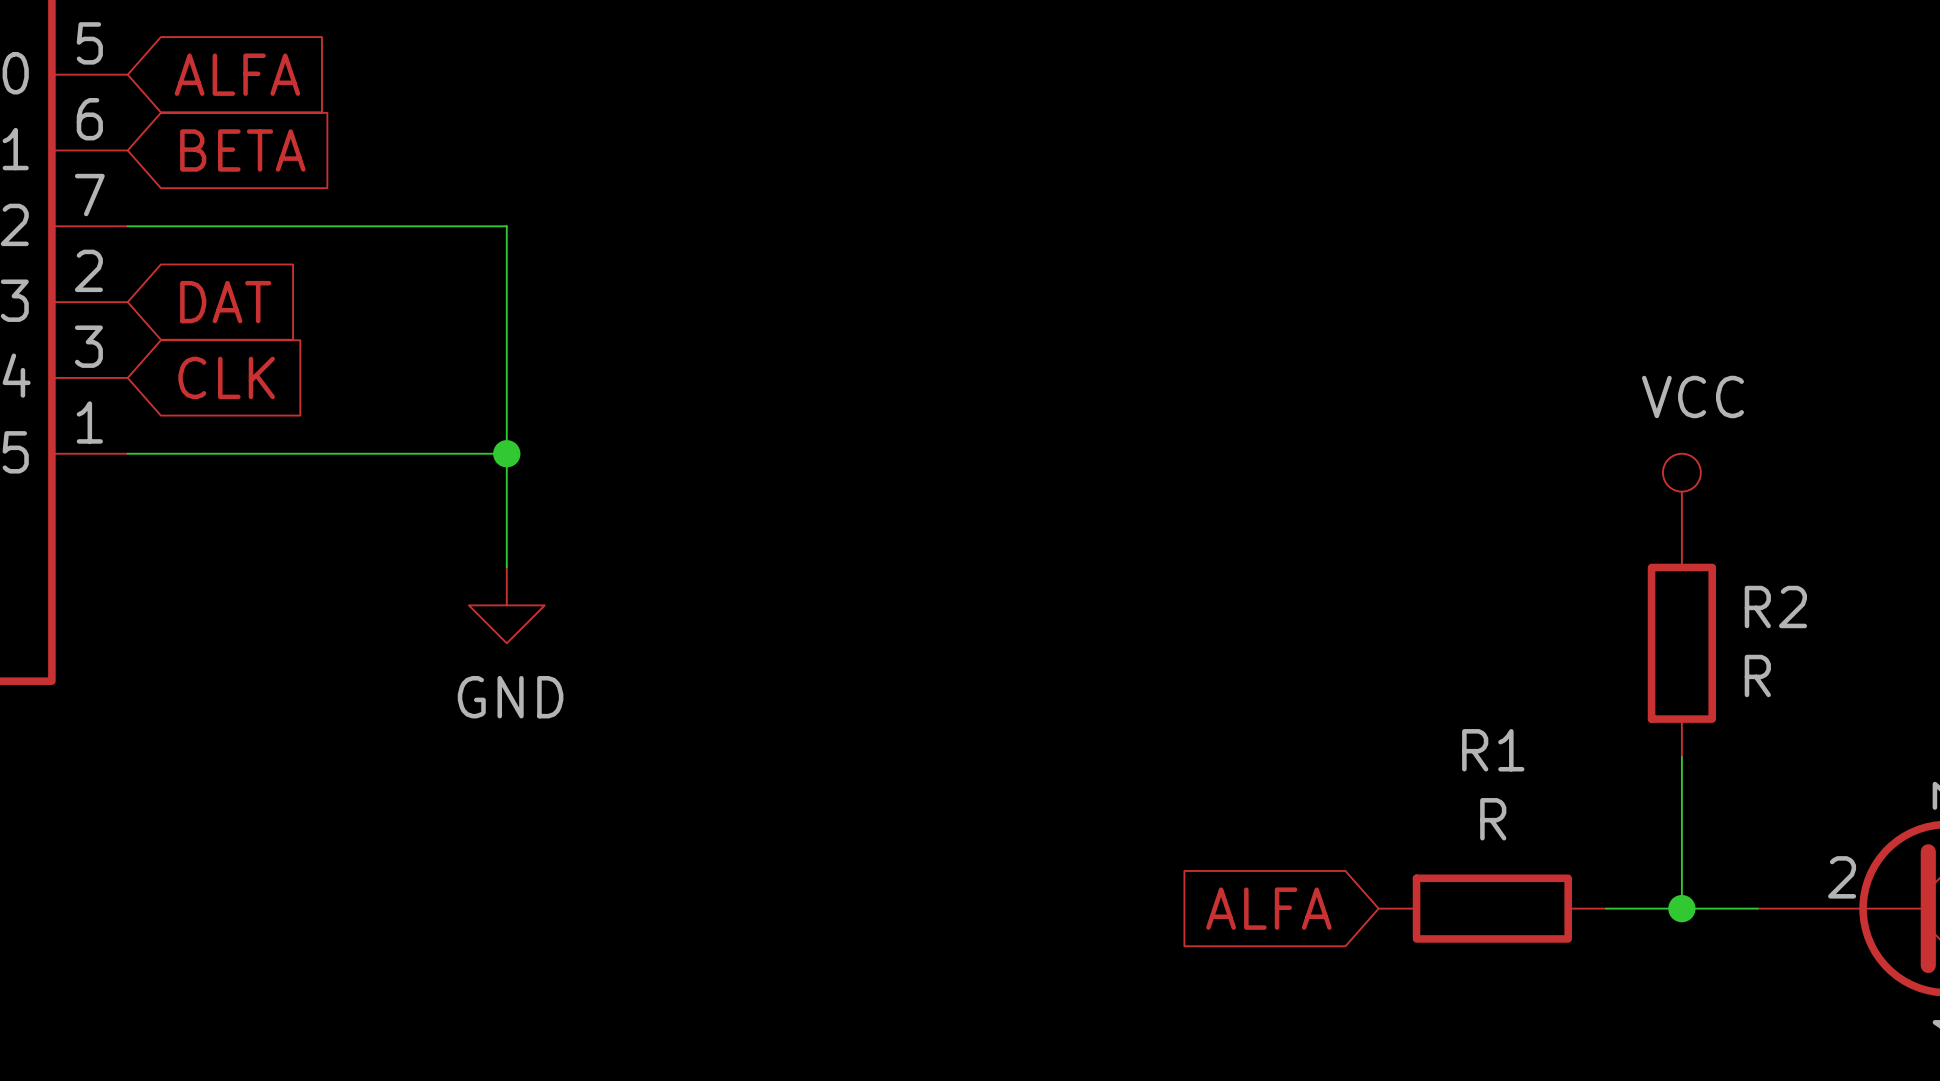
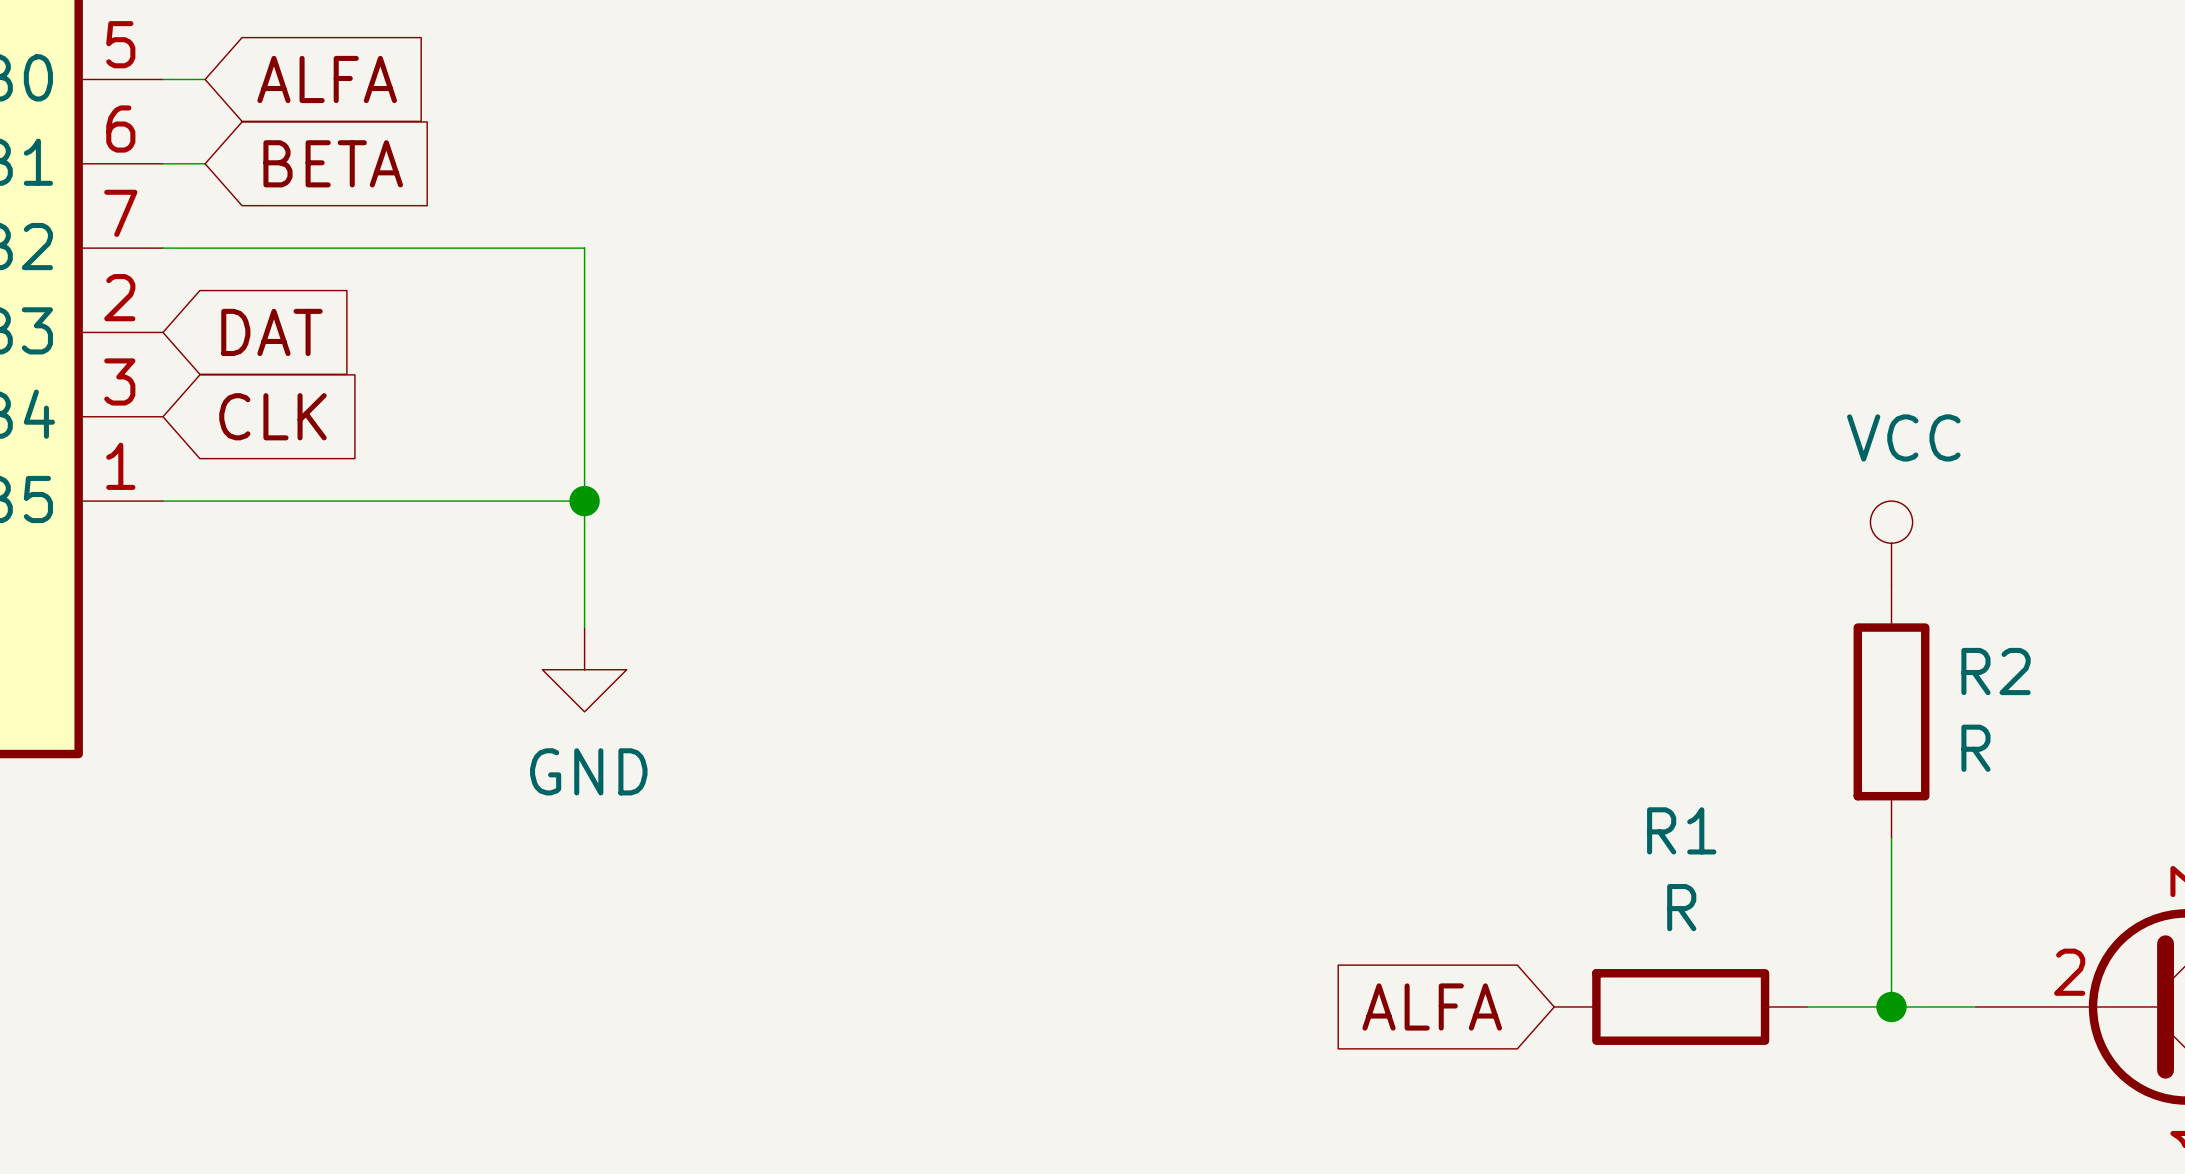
wire: none -> (162, 79) (205, 79)
global label position: ALFA (237, 74) -> ALFA (327, 79)
wire: none -> (162, 163) (205, 163)
global label position: BETA (242, 150) -> BETA (333, 163)

